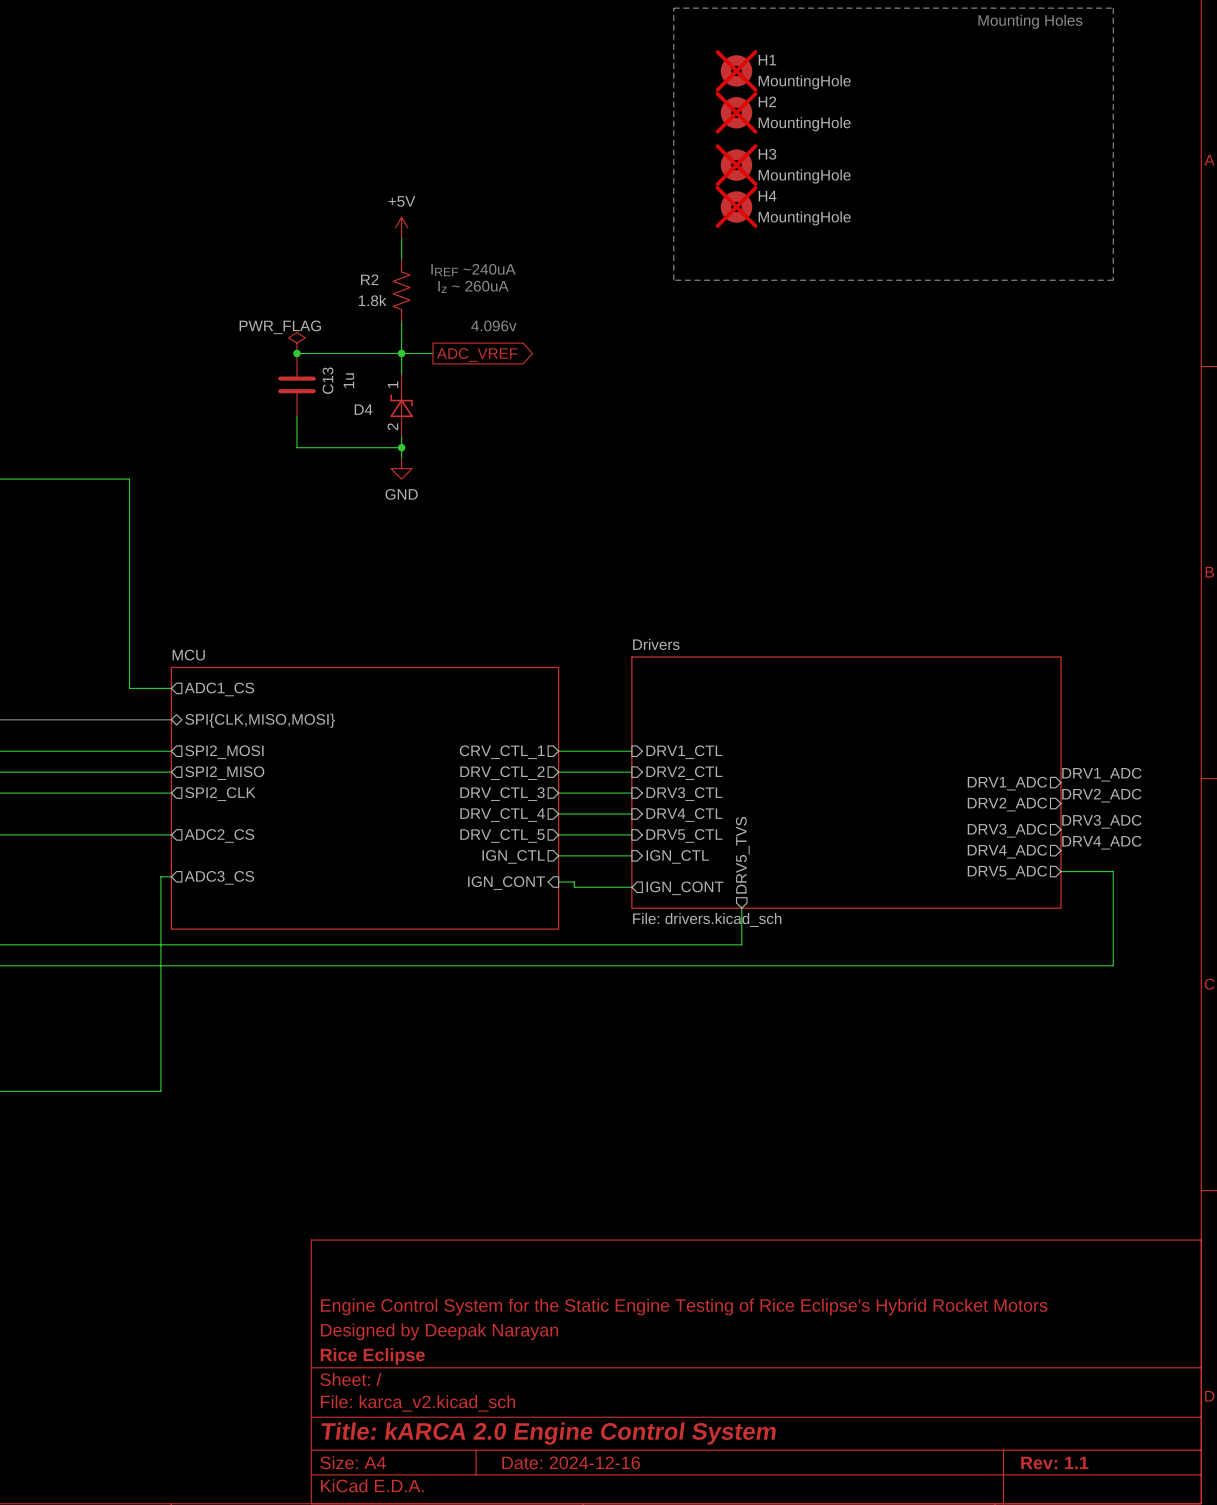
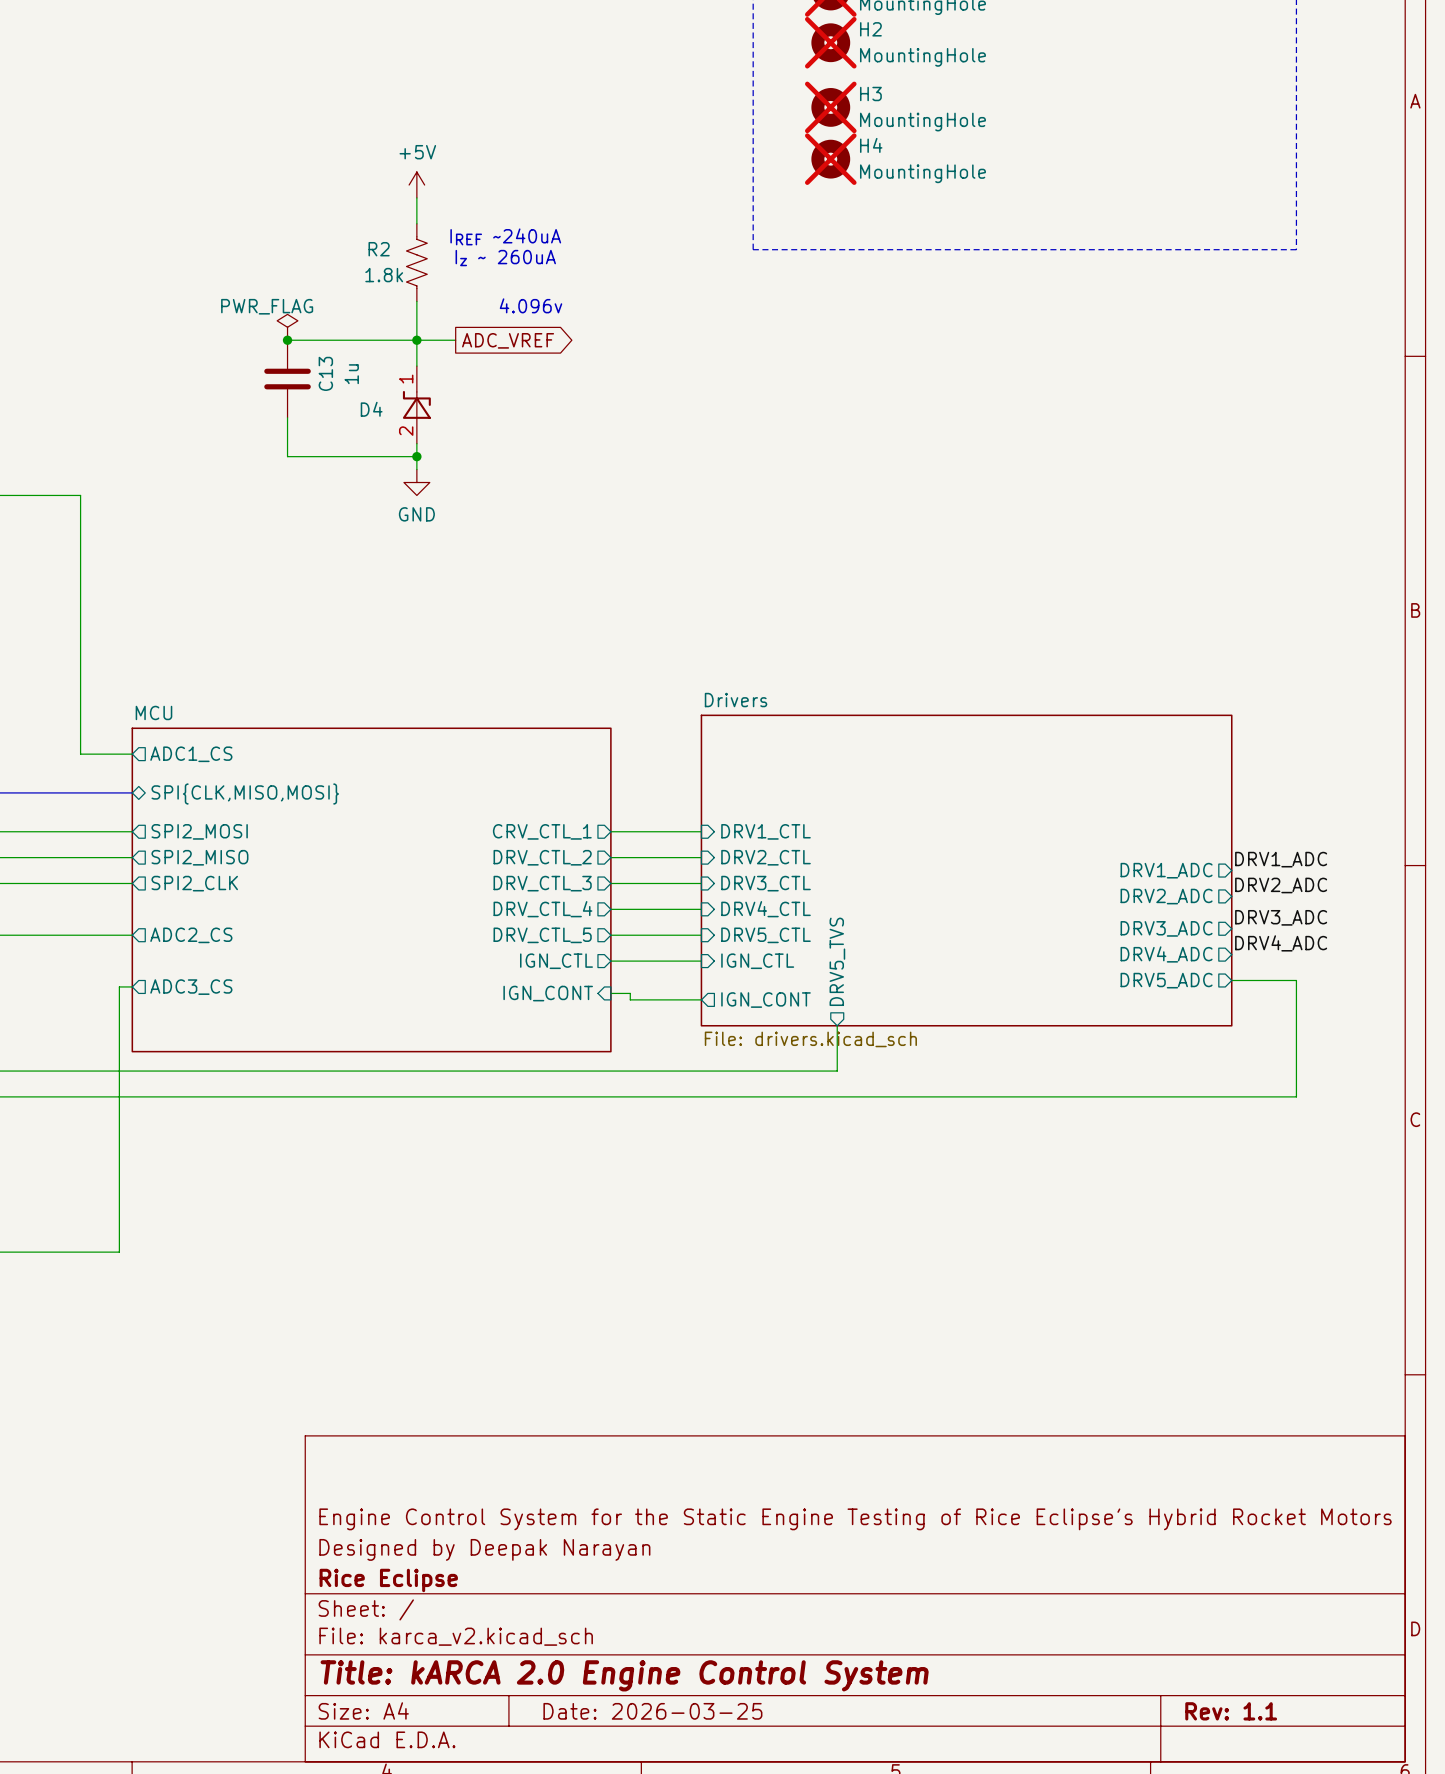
title block: Date: 2024-12-16 (571, 1462) -> Date: 2026-03-25 (652, 1711)

